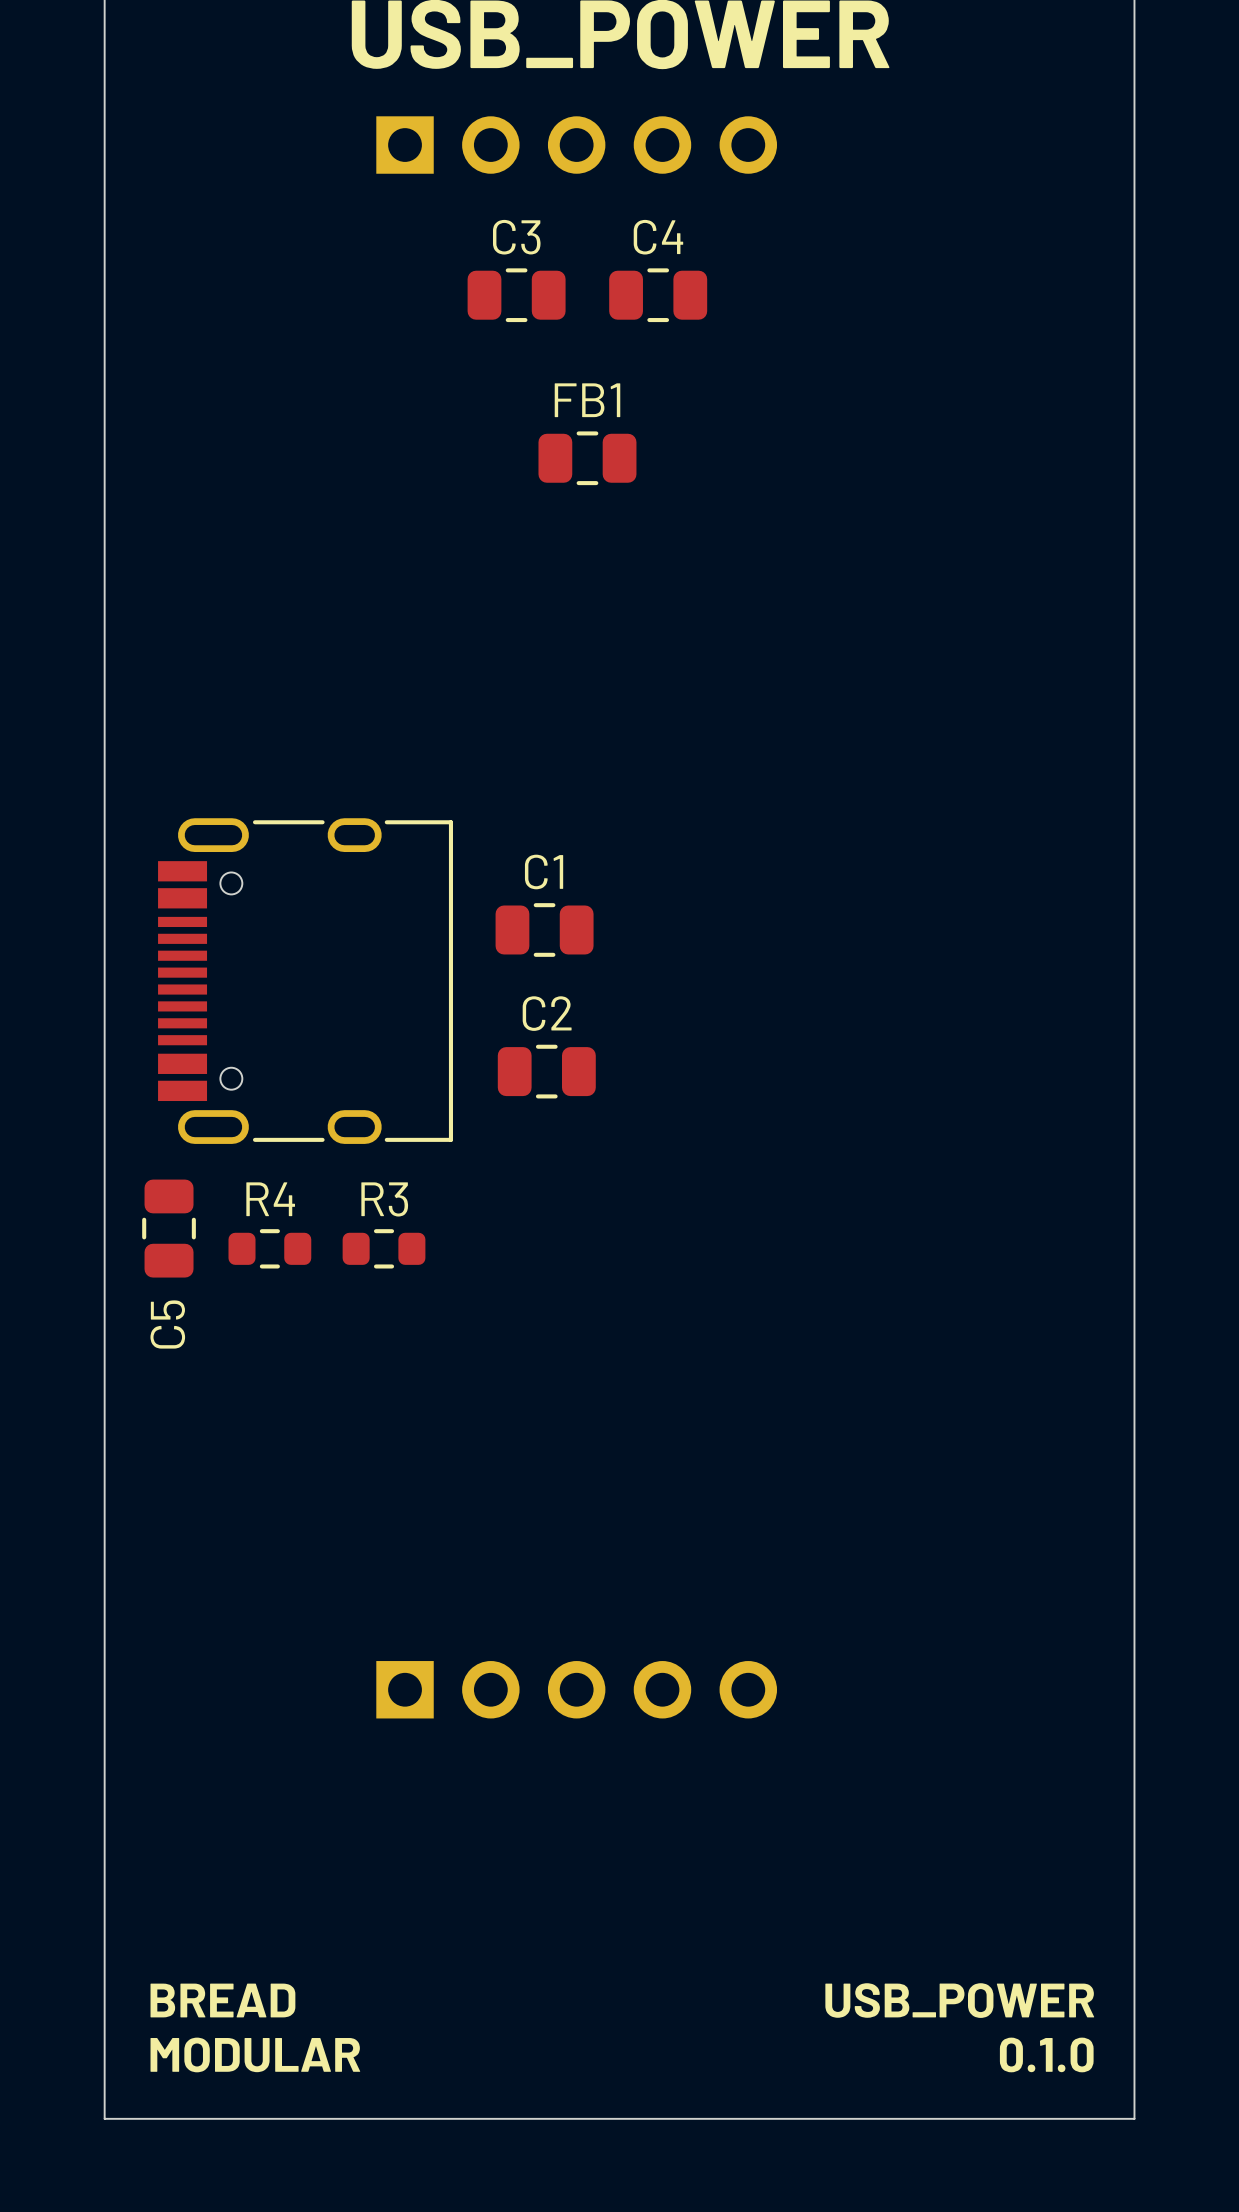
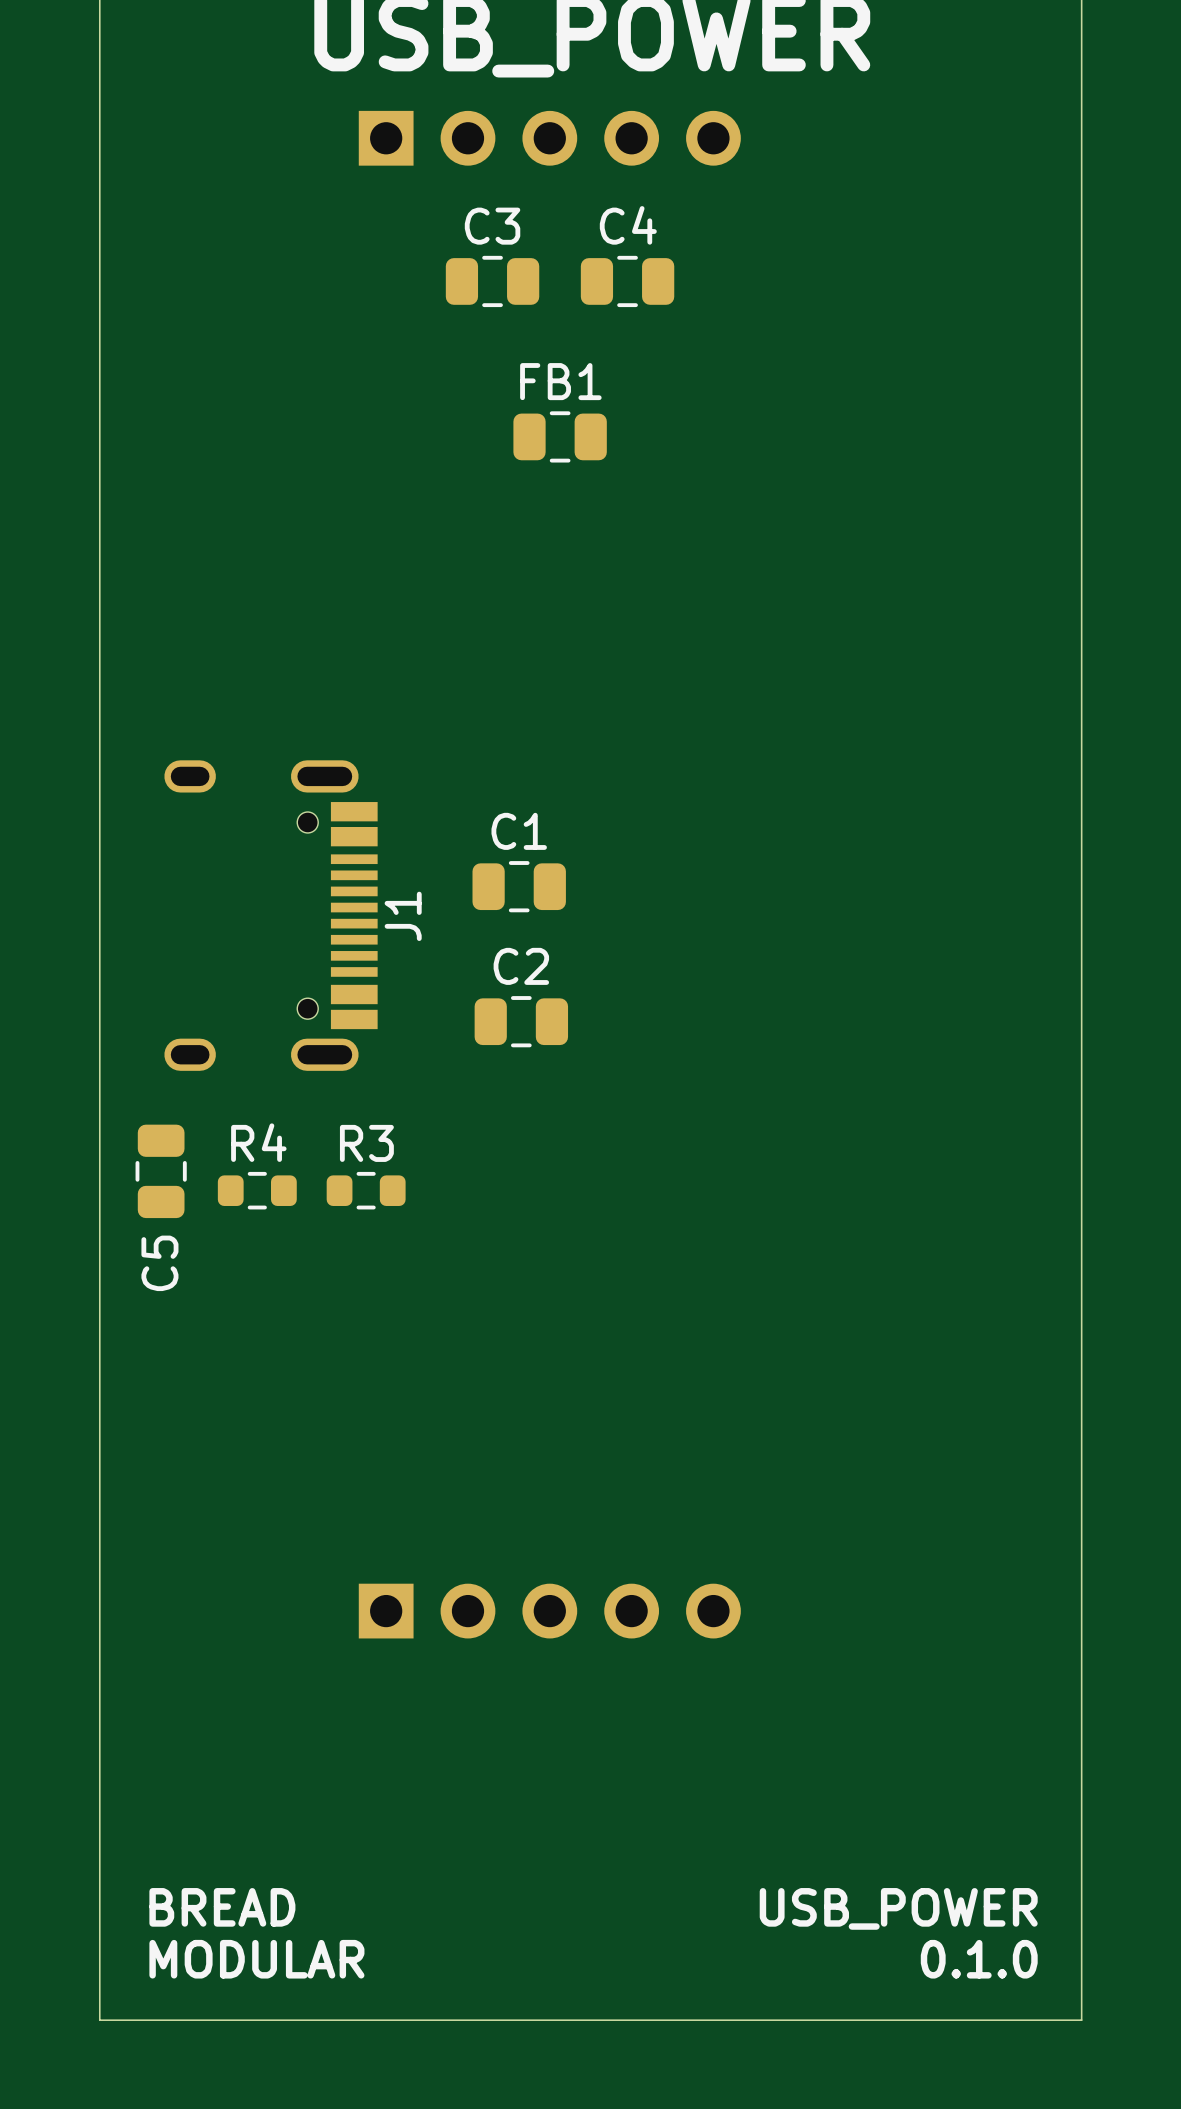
J1: none -> (271, 915)
part: (305, 981) -> none

